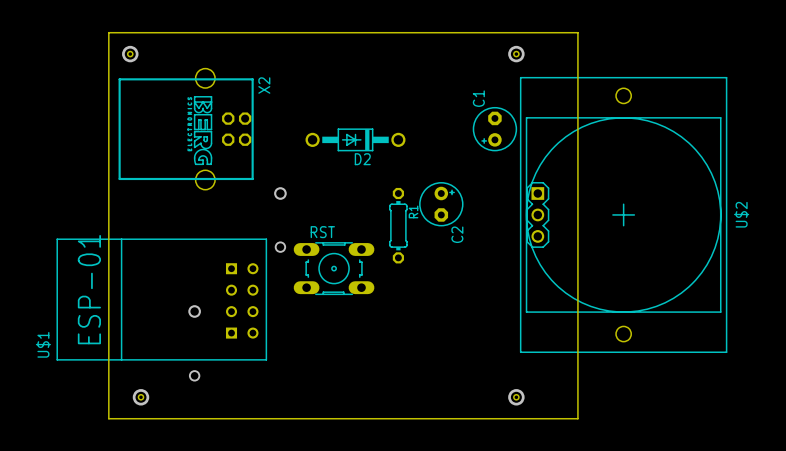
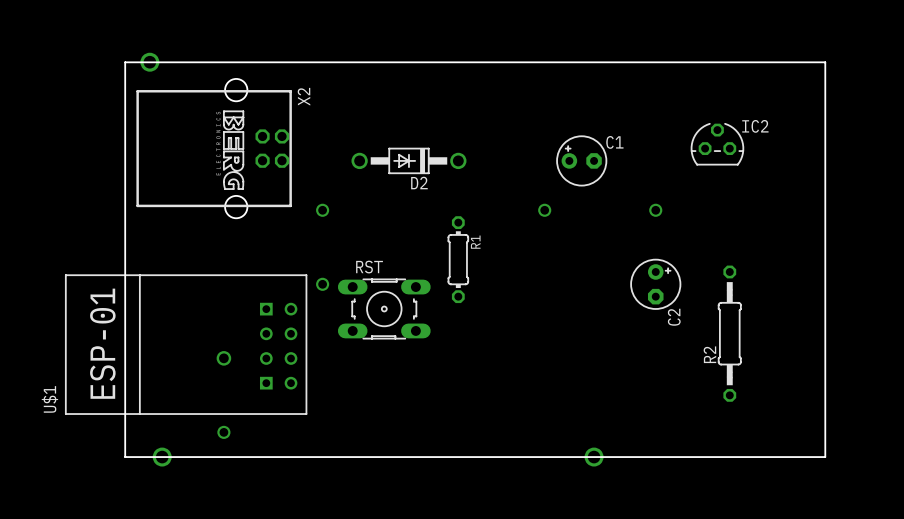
board edge: (108, 54) (108, 32) (577, 32) (577, 418) (108, 418) (108, 397) -> (125, 62) (825, 62) (825, 457) (125, 457)
hole: (130, 54) -> none
hole: (516, 54) -> none
via: (516, 54) -> none
IC2: none -> (717, 144)
C1 rotation: 0° (494, 129) -> 90° clockwise (581, 160)
via: none -> (322, 210)
via: none -> (544, 210)
via: none -> (655, 210)
via: (280, 193) -> none
C2 position: (441, 204) -> (655, 284)
U$2: (623, 214) -> none
R2: none -> (729, 333)
hole: (141, 397) -> none
hole: (516, 397) -> none

